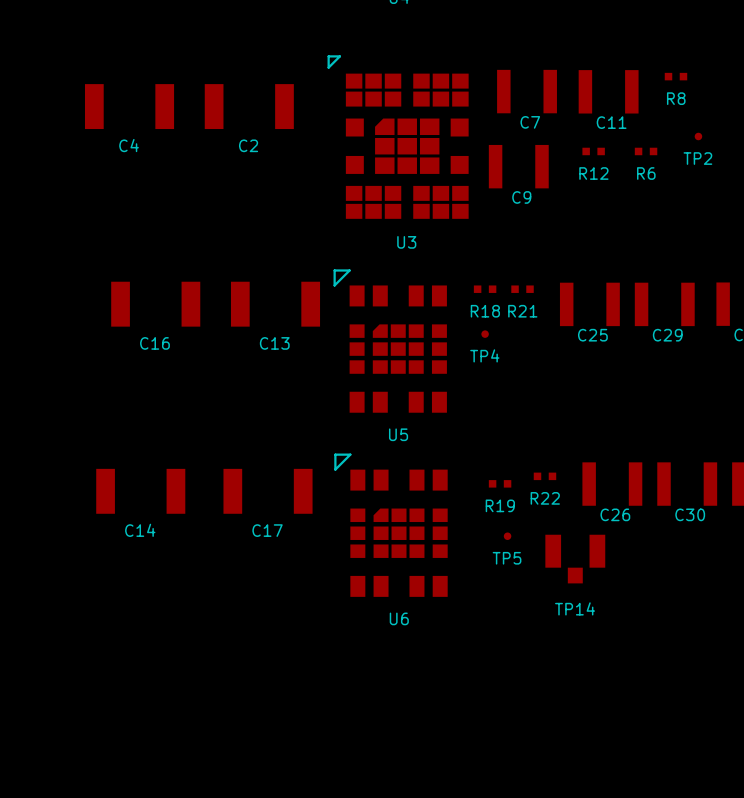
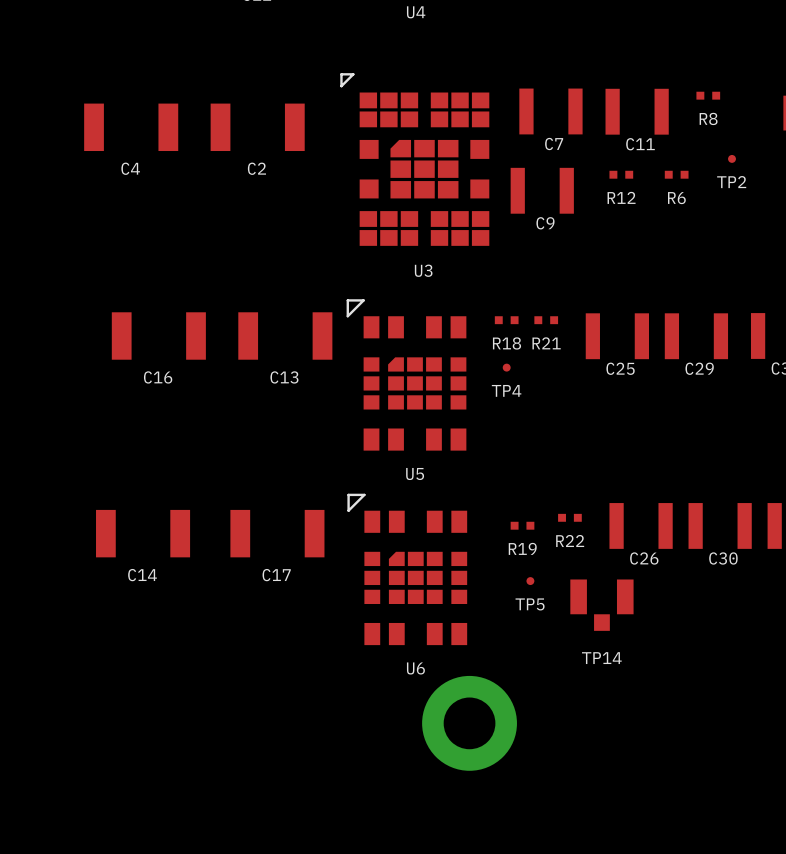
part: none -> (469, 723)

